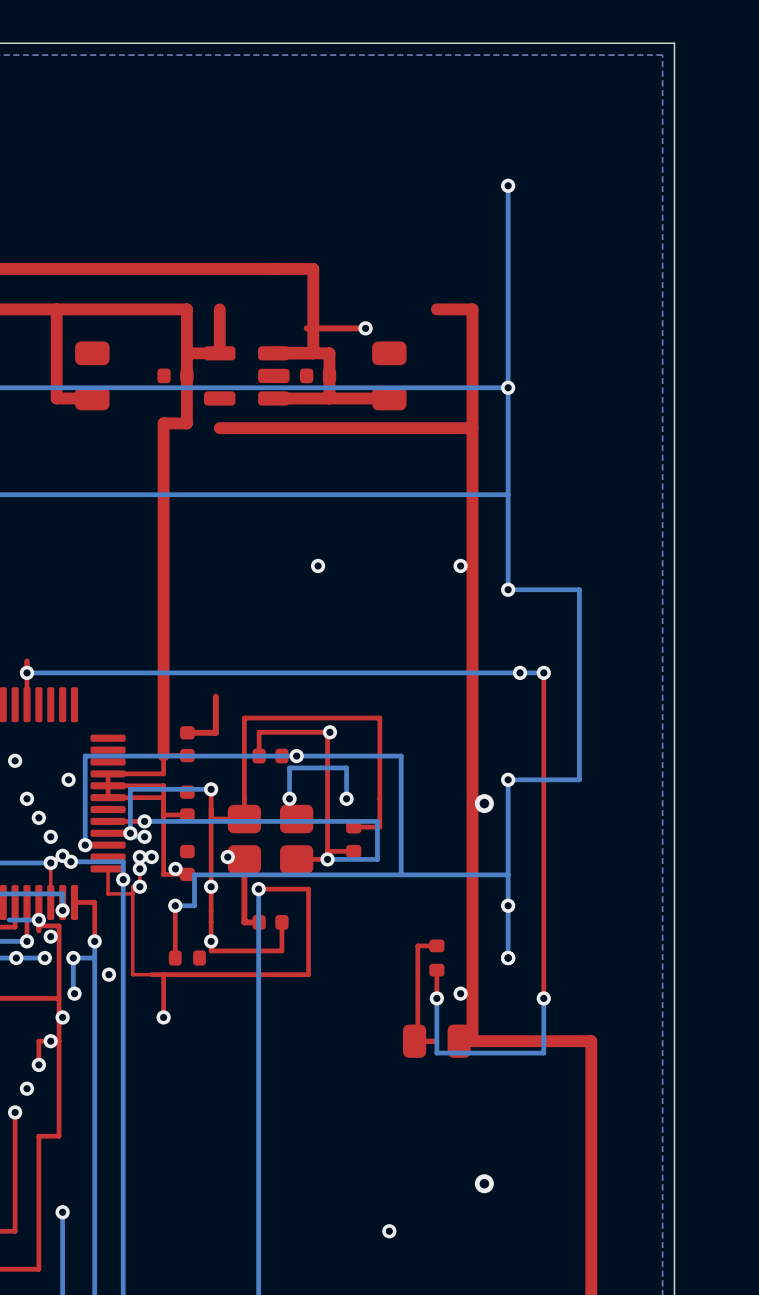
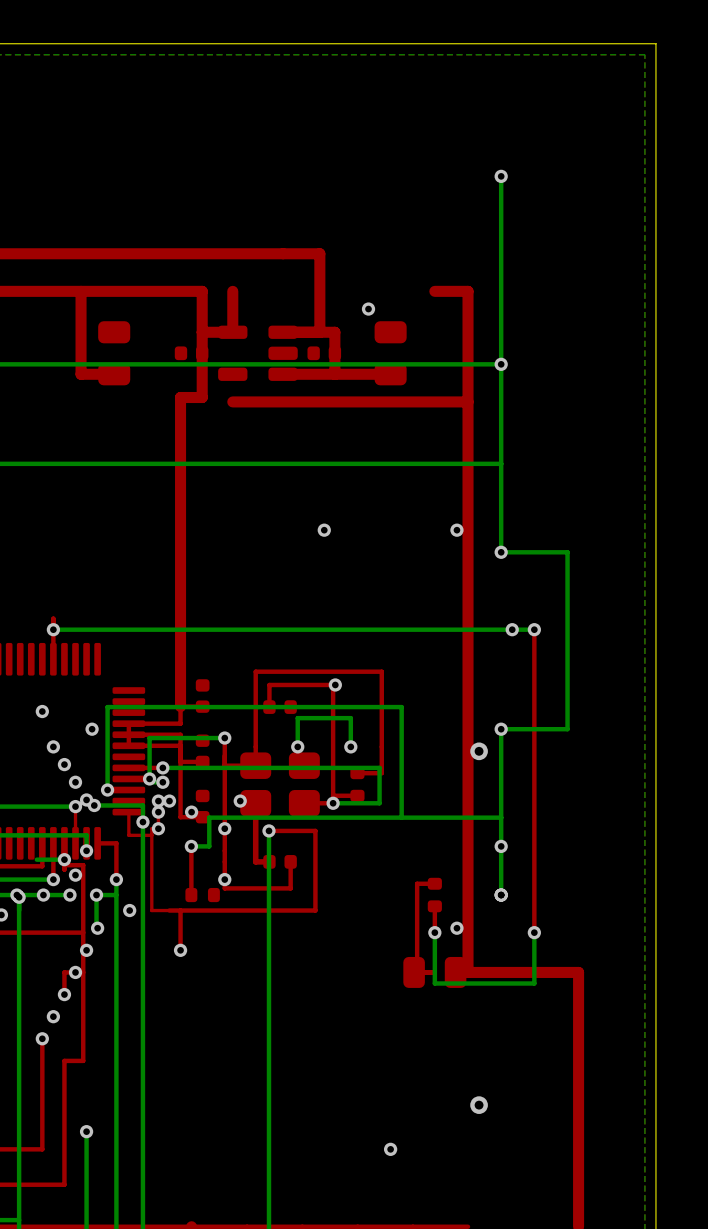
top track: (365, 328) (306, 328) -> none
top track: (215, 696) (215, 732) (187, 732) -> none
via: (296, 756) -> none

